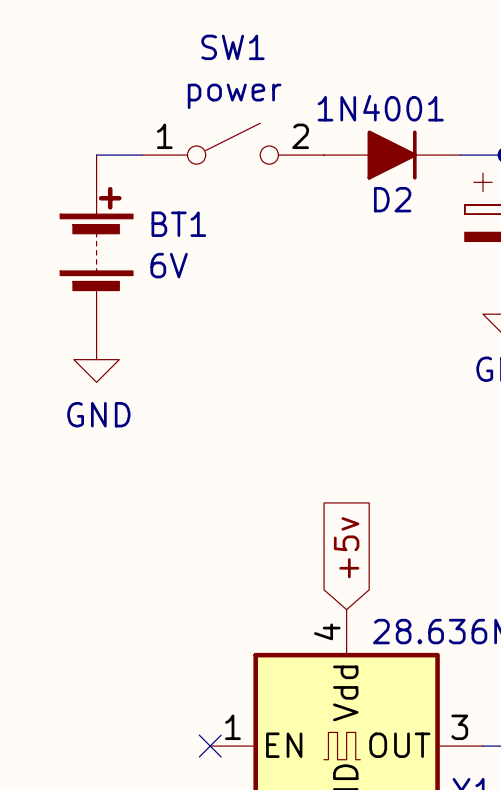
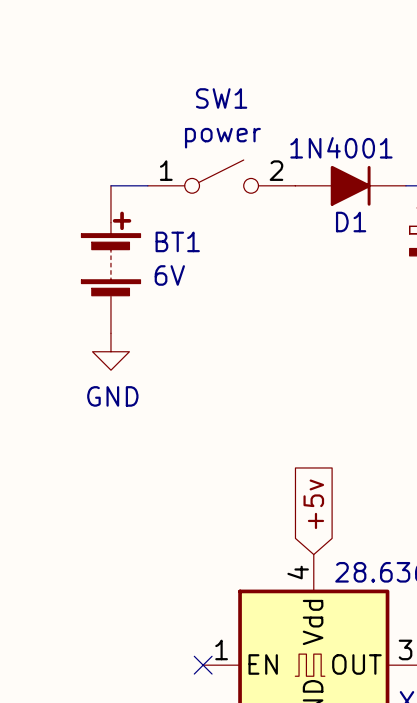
D2 name: D2 (392, 199) -> D1 (351, 222)

